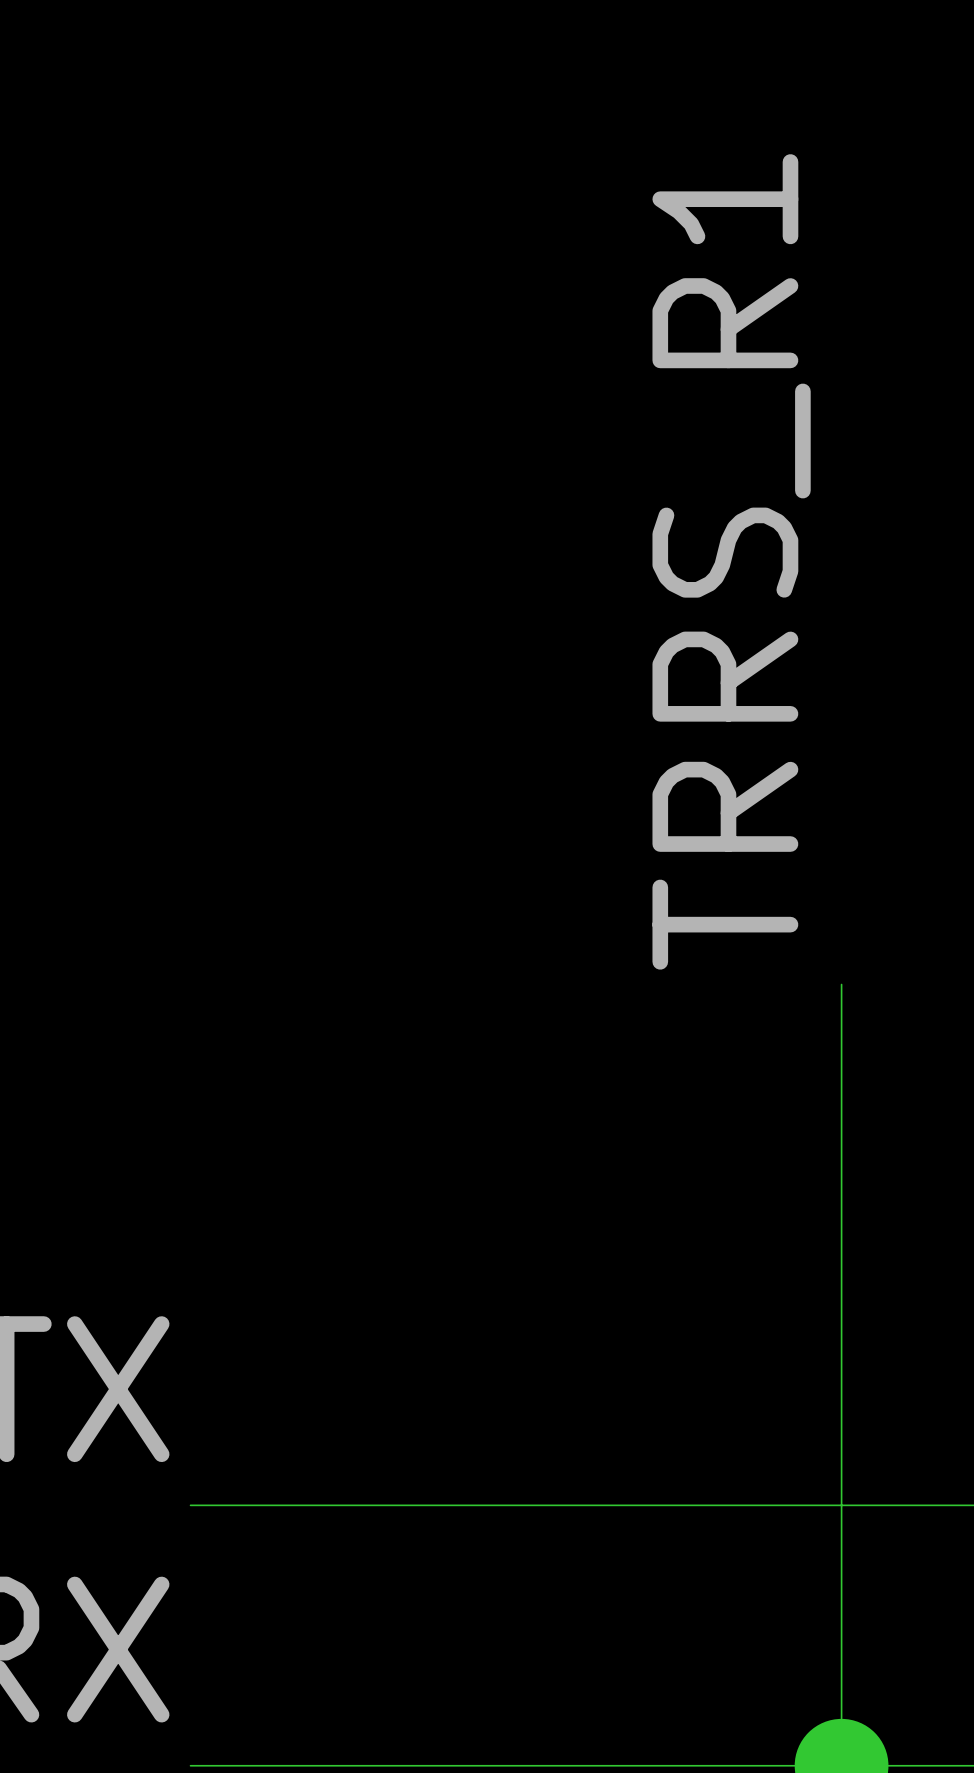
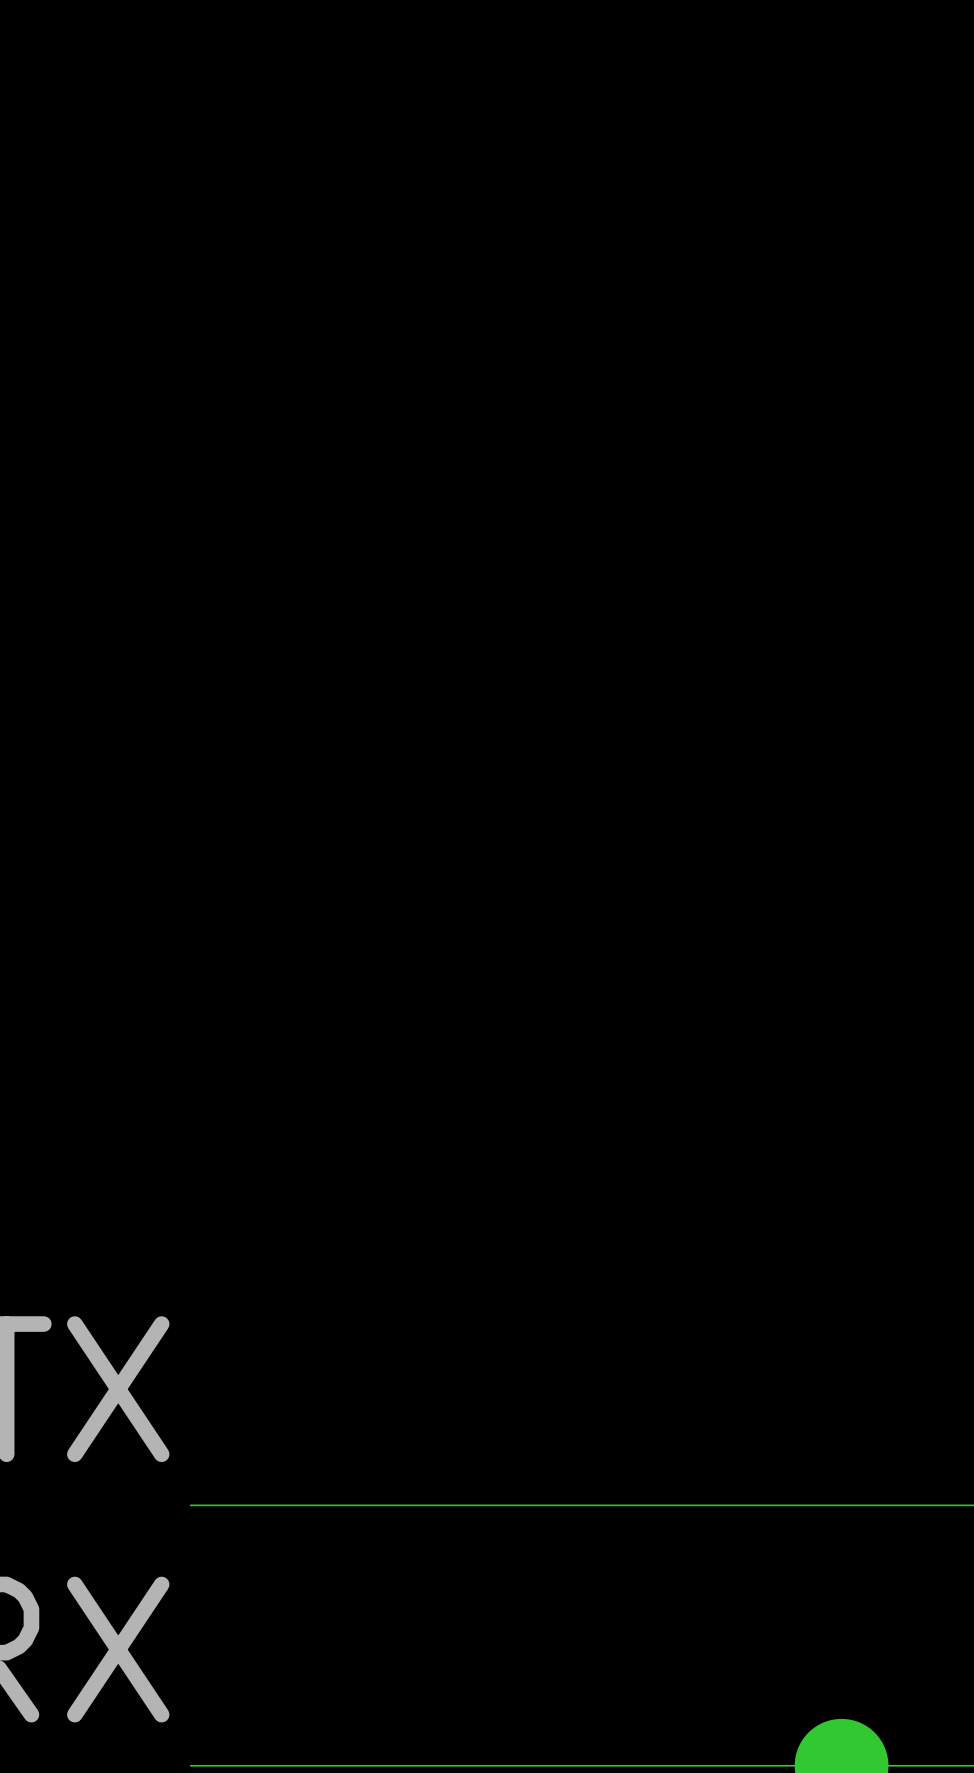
label: TRRS_R1 (731, 561) -> none
wire: (841, 984) (841, 1765) -> none

